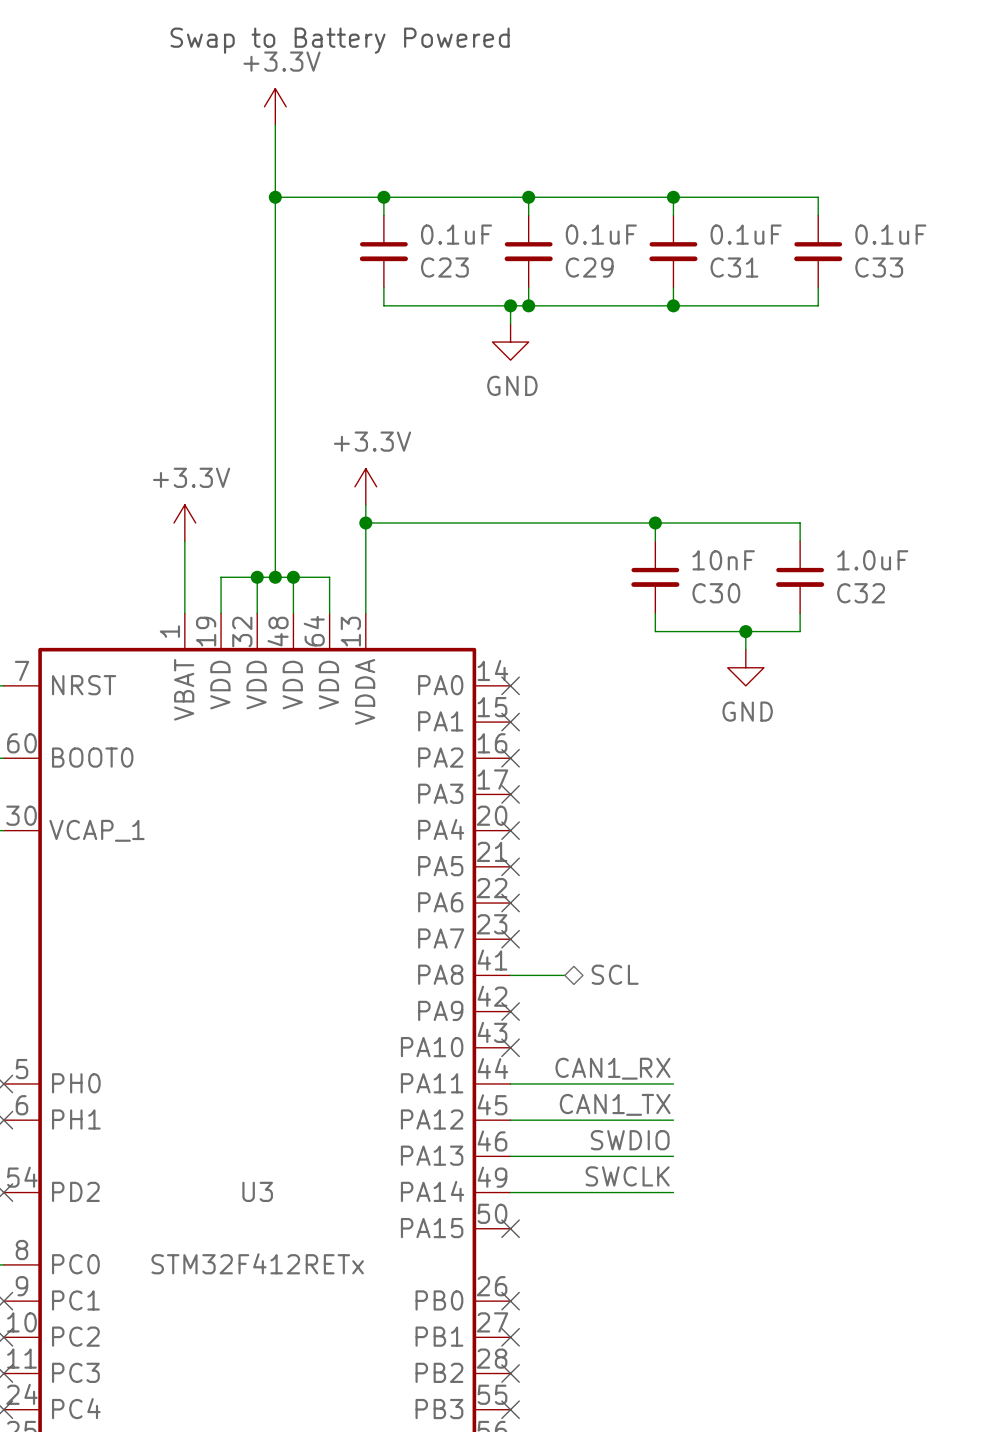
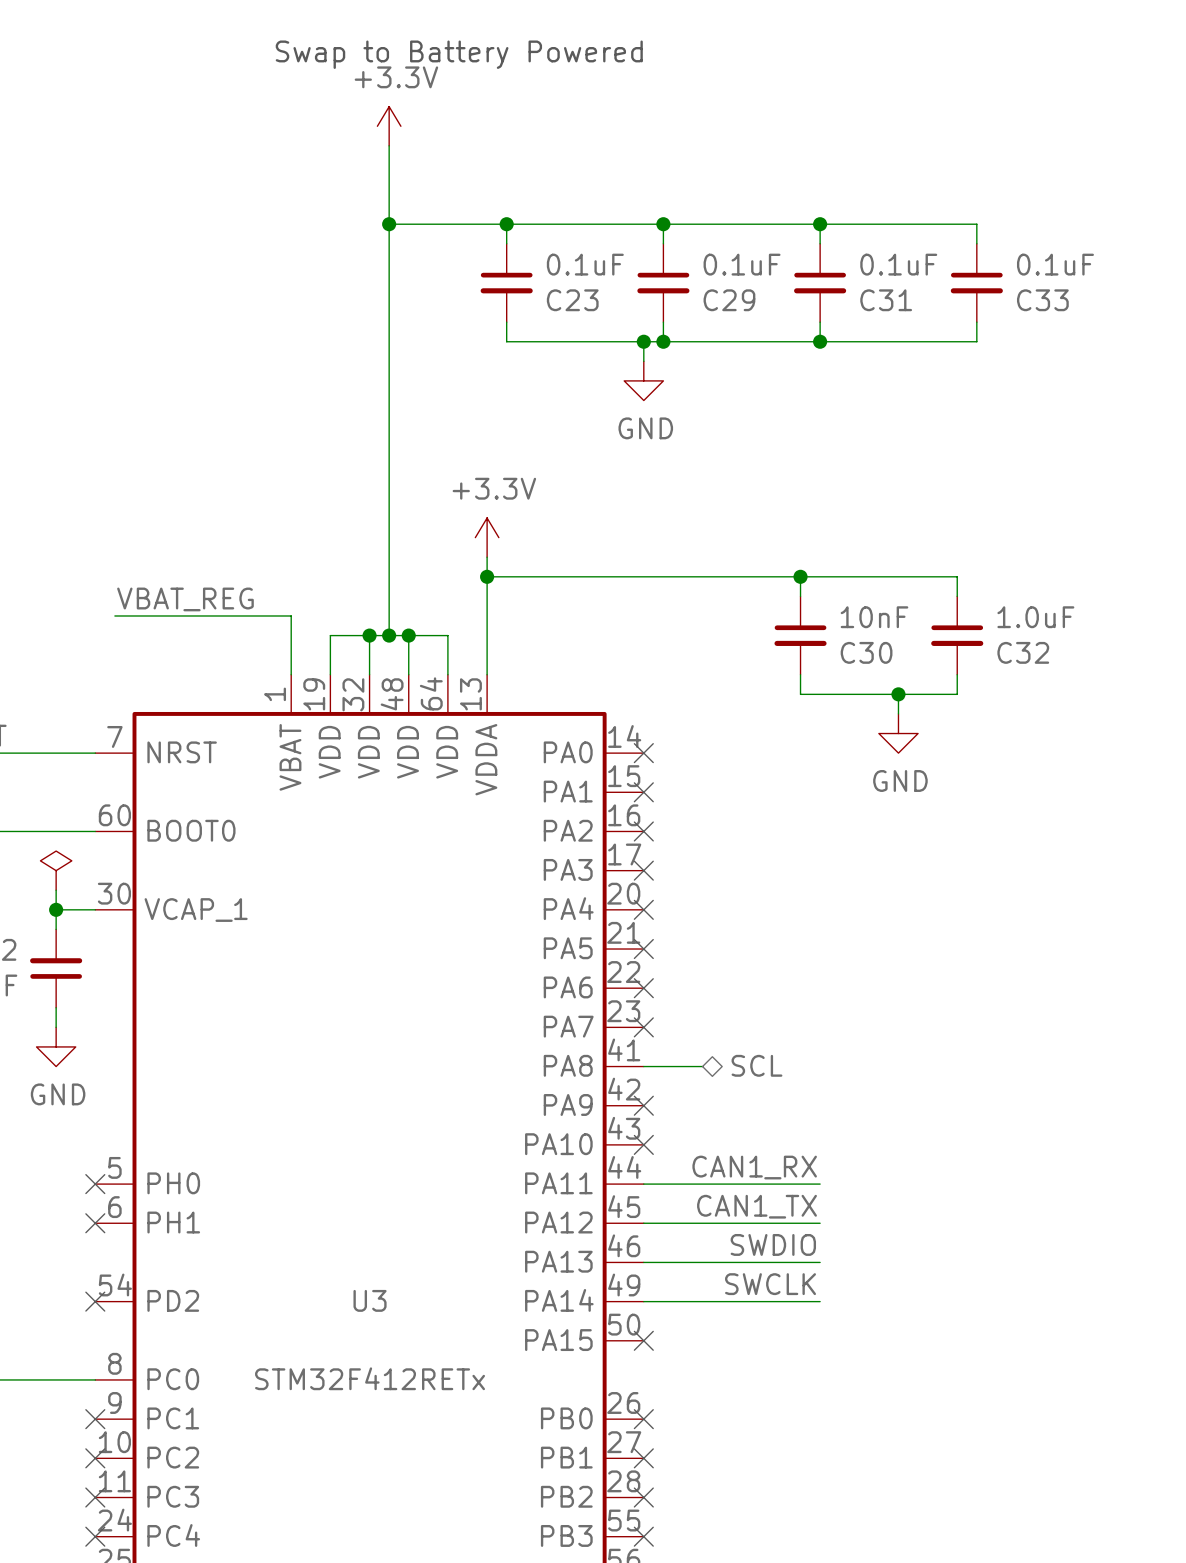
power symbol: +3.3V (184, 523) -> none
wire: (184, 541) (184, 559) -> (114, 615) (291, 615)
label: none -> VBAT_REG (185, 599)

